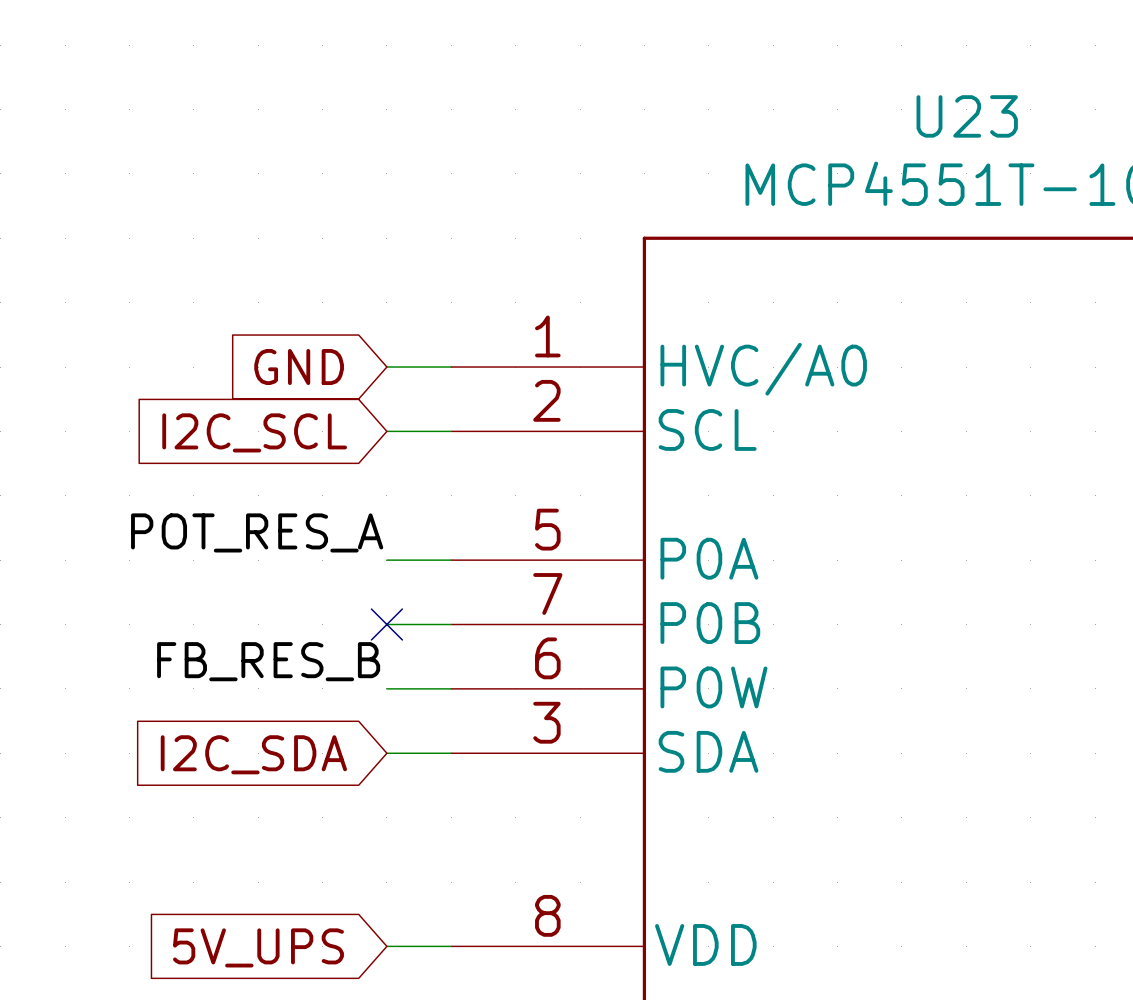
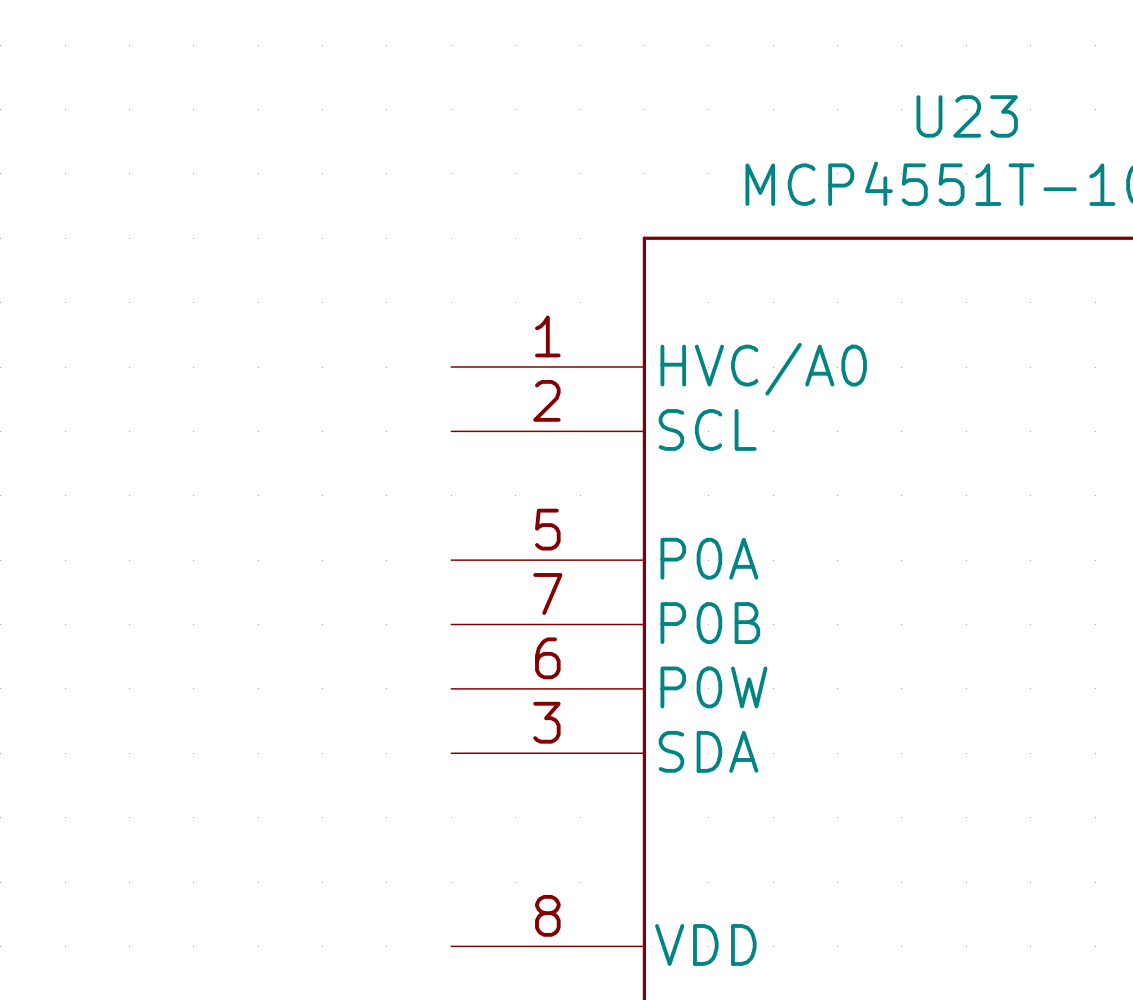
global label: GND (299, 367) -> none
wire: (386, 367) (451, 367) -> none
wire: (386, 431) (451, 431) -> none
global label: I2C_SCL (254, 432) -> none
label: POT_RES_A (257, 532) -> none
wire: (386, 560) (451, 560) -> none
wire: (386, 624) (451, 624) -> none
no-connect mark: (386, 624) -> none
label: FB_RES_B (268, 661) -> none
wire: (386, 688) (451, 688) -> none
wire: (386, 753) (451, 753) -> none
global label: I2C_SDA (253, 754) -> none
wire: (386, 946) (451, 946) -> none
global label: 5V_UPS (258, 947) -> none

